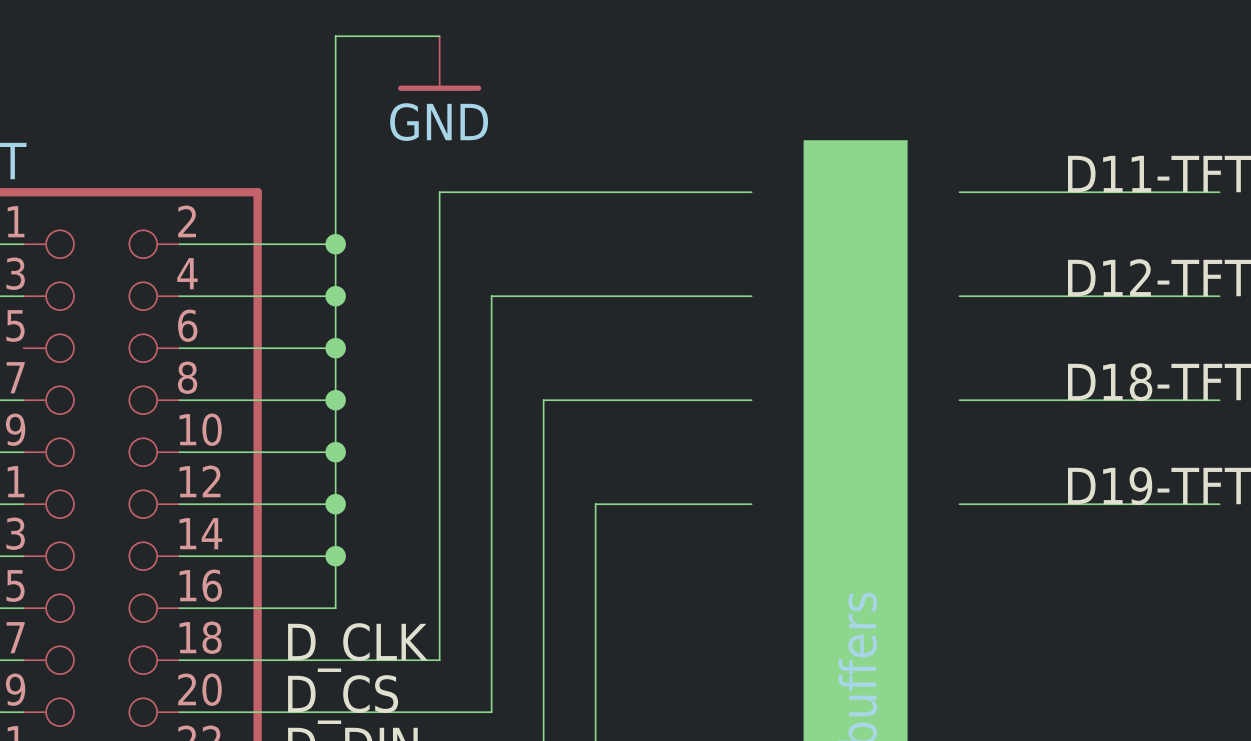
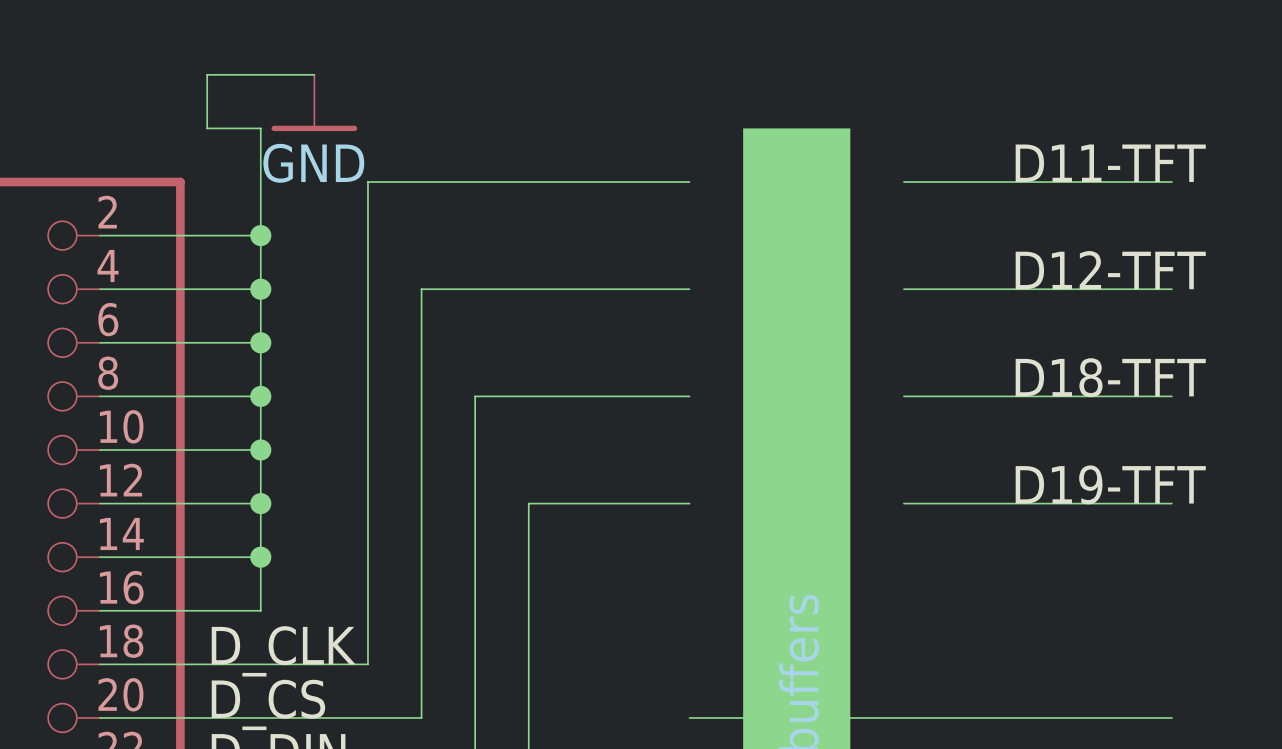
wire: (439, 36) (335, 36) (335, 140) -> (314, 74) (207, 74) (207, 128) (260, 128)
power symbol position: GND (439, 63) -> GND (314, 102)
wire: none -> (689, 717) (1171, 717)

